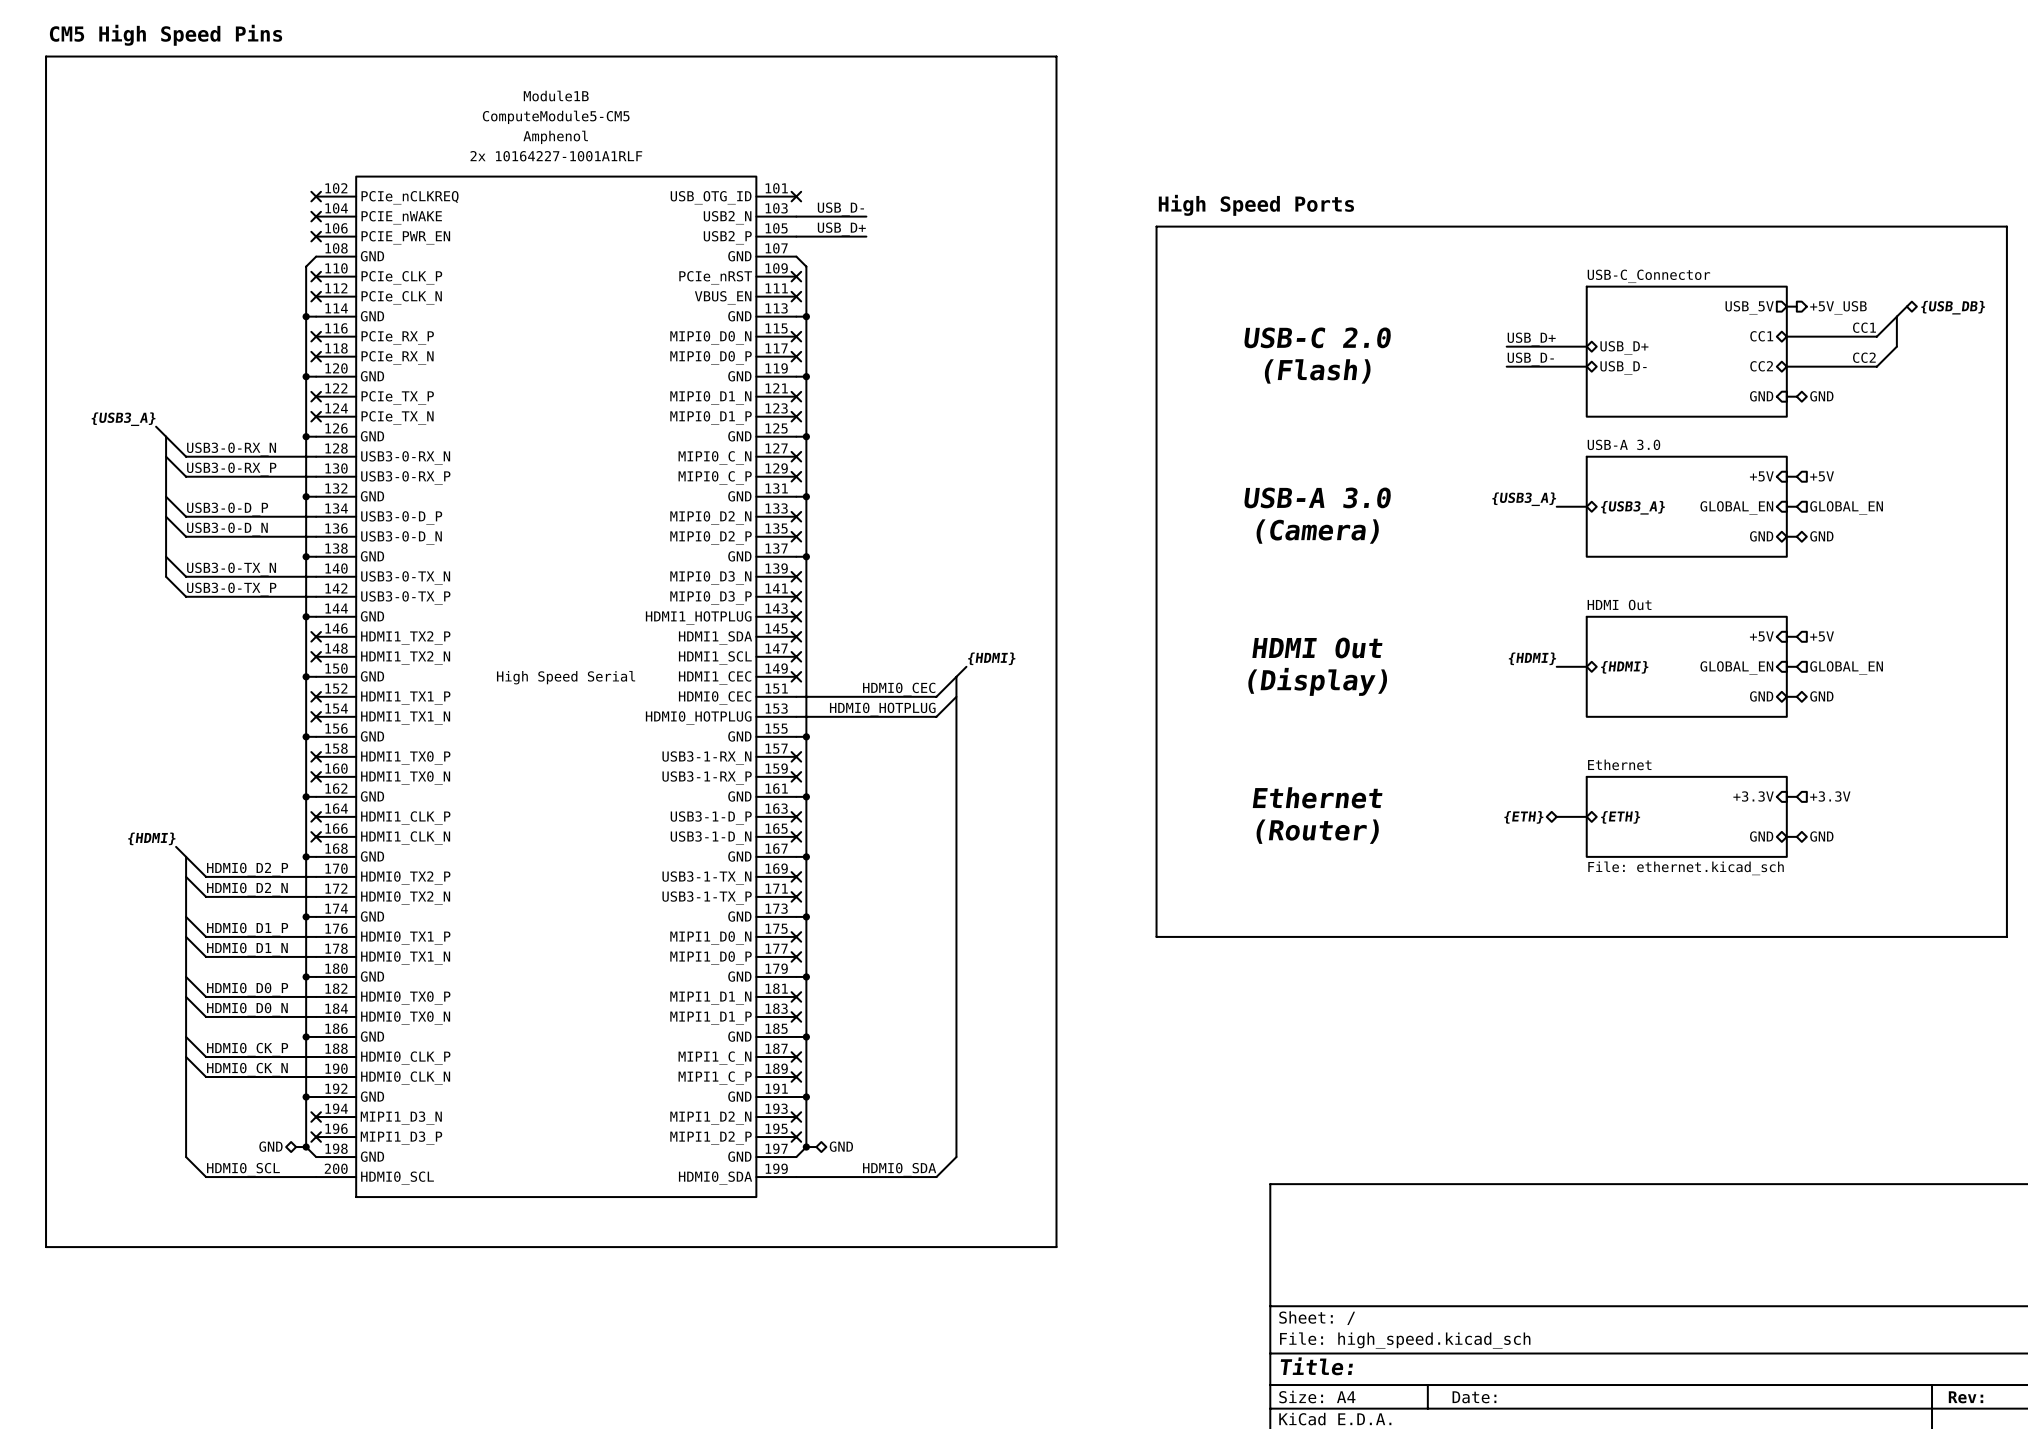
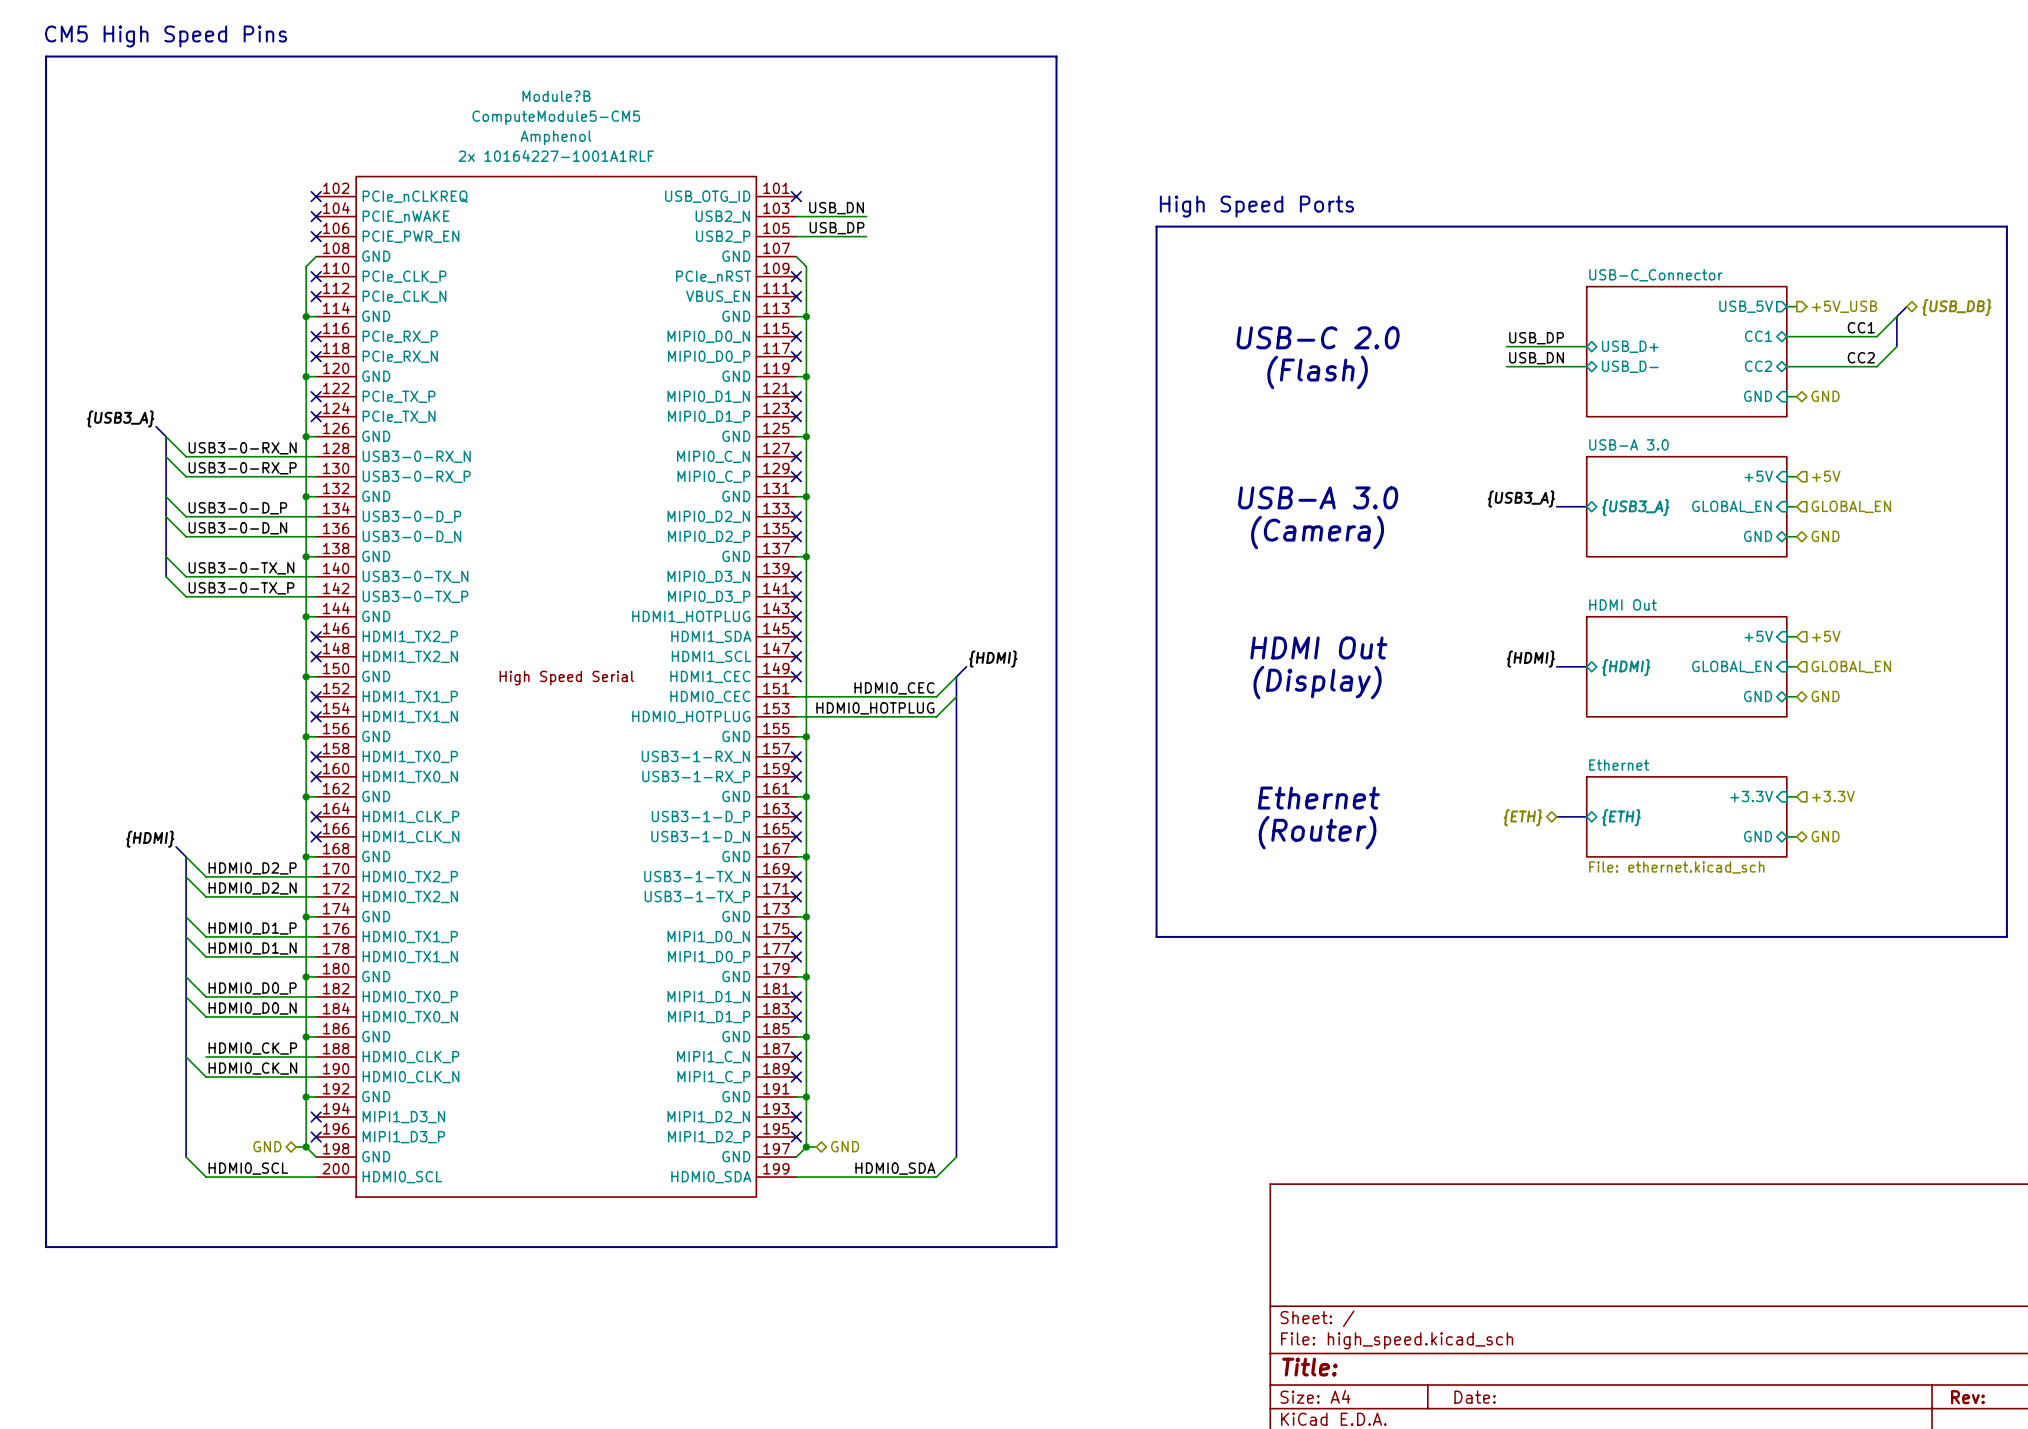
Module1B name: Module1B (556, 96) -> Module?B (556, 96)
label: USB_D- (840, 209) -> USB_DN (836, 208)
label: USB_D+ (841, 229) -> USB_DP (837, 228)
label: USB_D+ (1531, 339) -> USB_DP (1536, 338)
label: USB_D- (1530, 359) -> USB_DN (1536, 358)
wire: (186, 1036) (206, 1056) -> none

